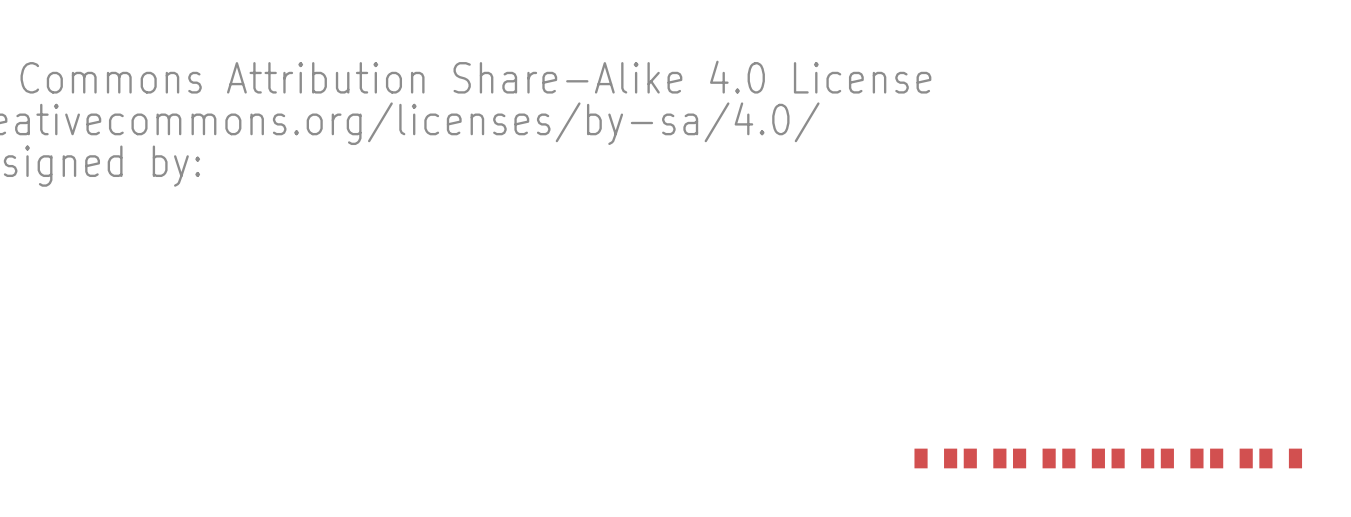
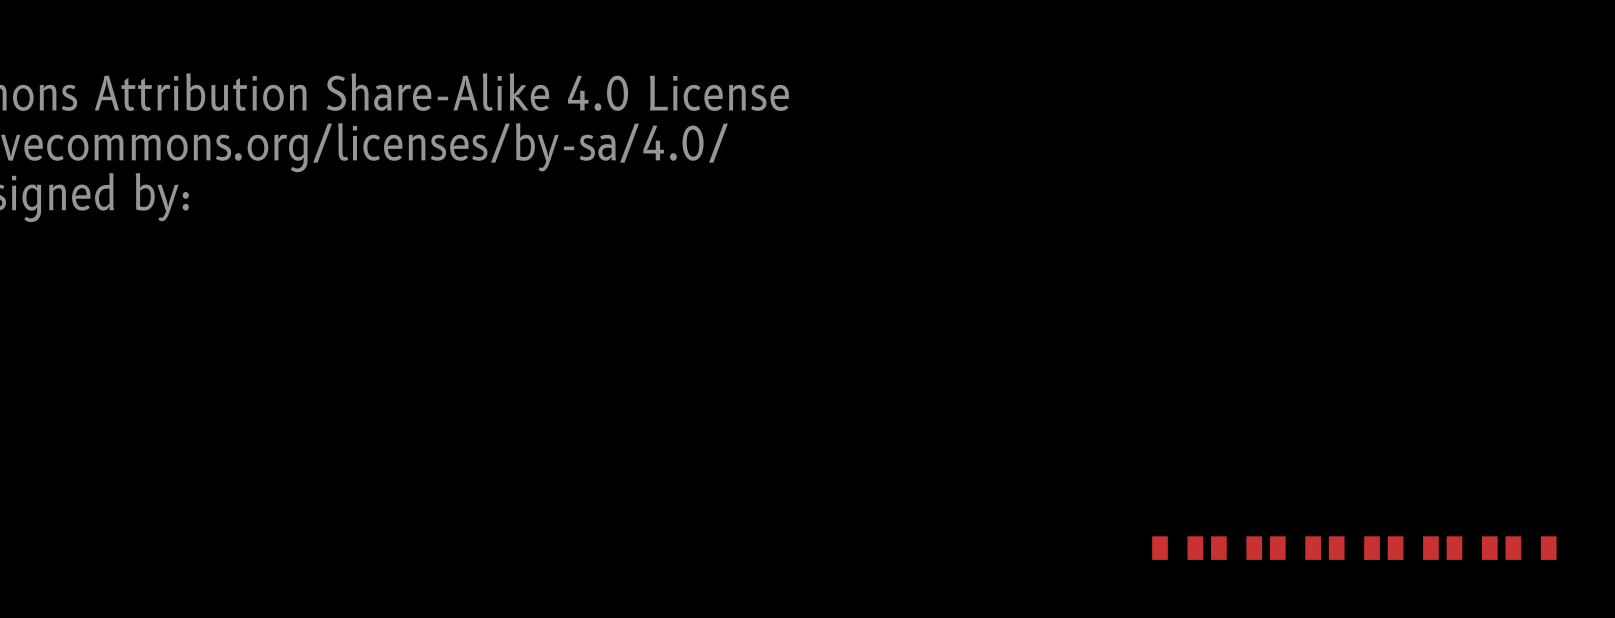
part: (935, 458) -> none

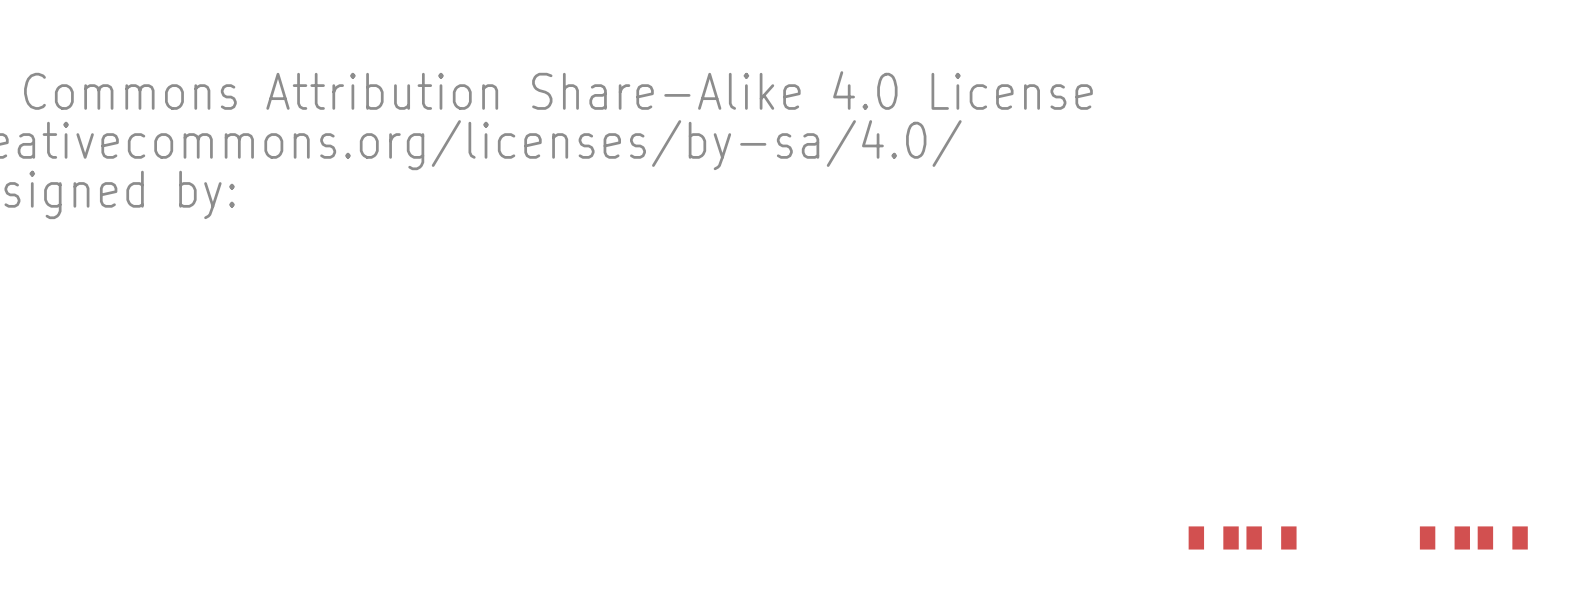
part: (1177, 548) -> none
part: (1354, 548) -> none
part: (1413, 548) -> none

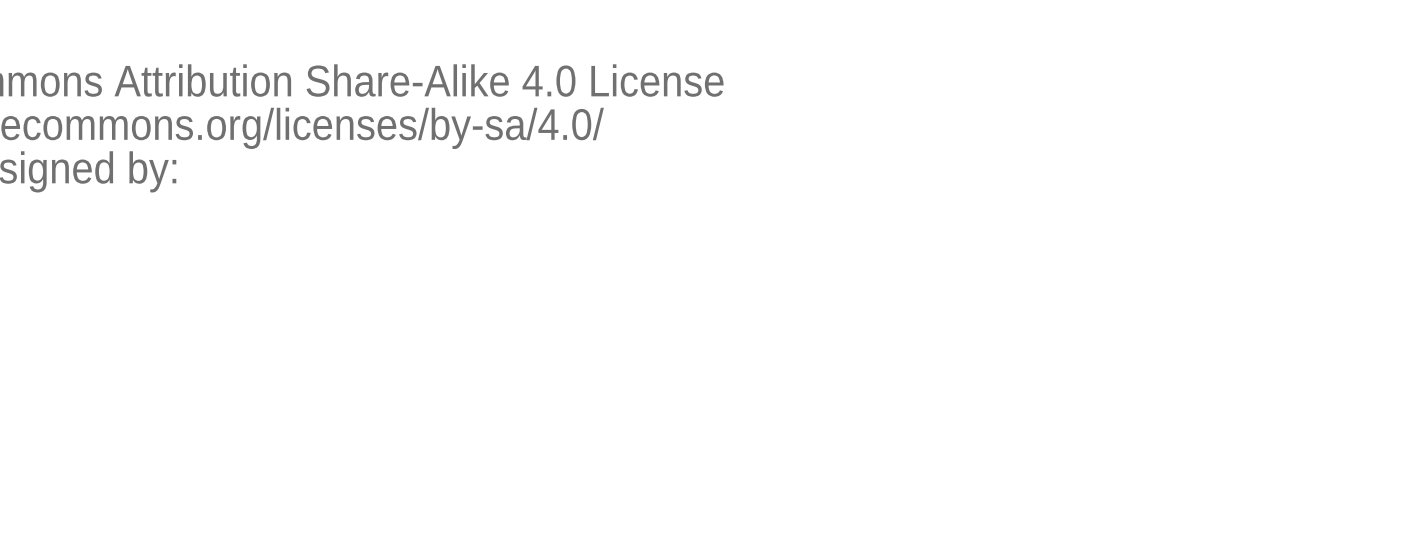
part: (1213, 537) -> none
part: (1271, 537) -> none
part: (1444, 537) -> none
part: (1502, 537) -> none

